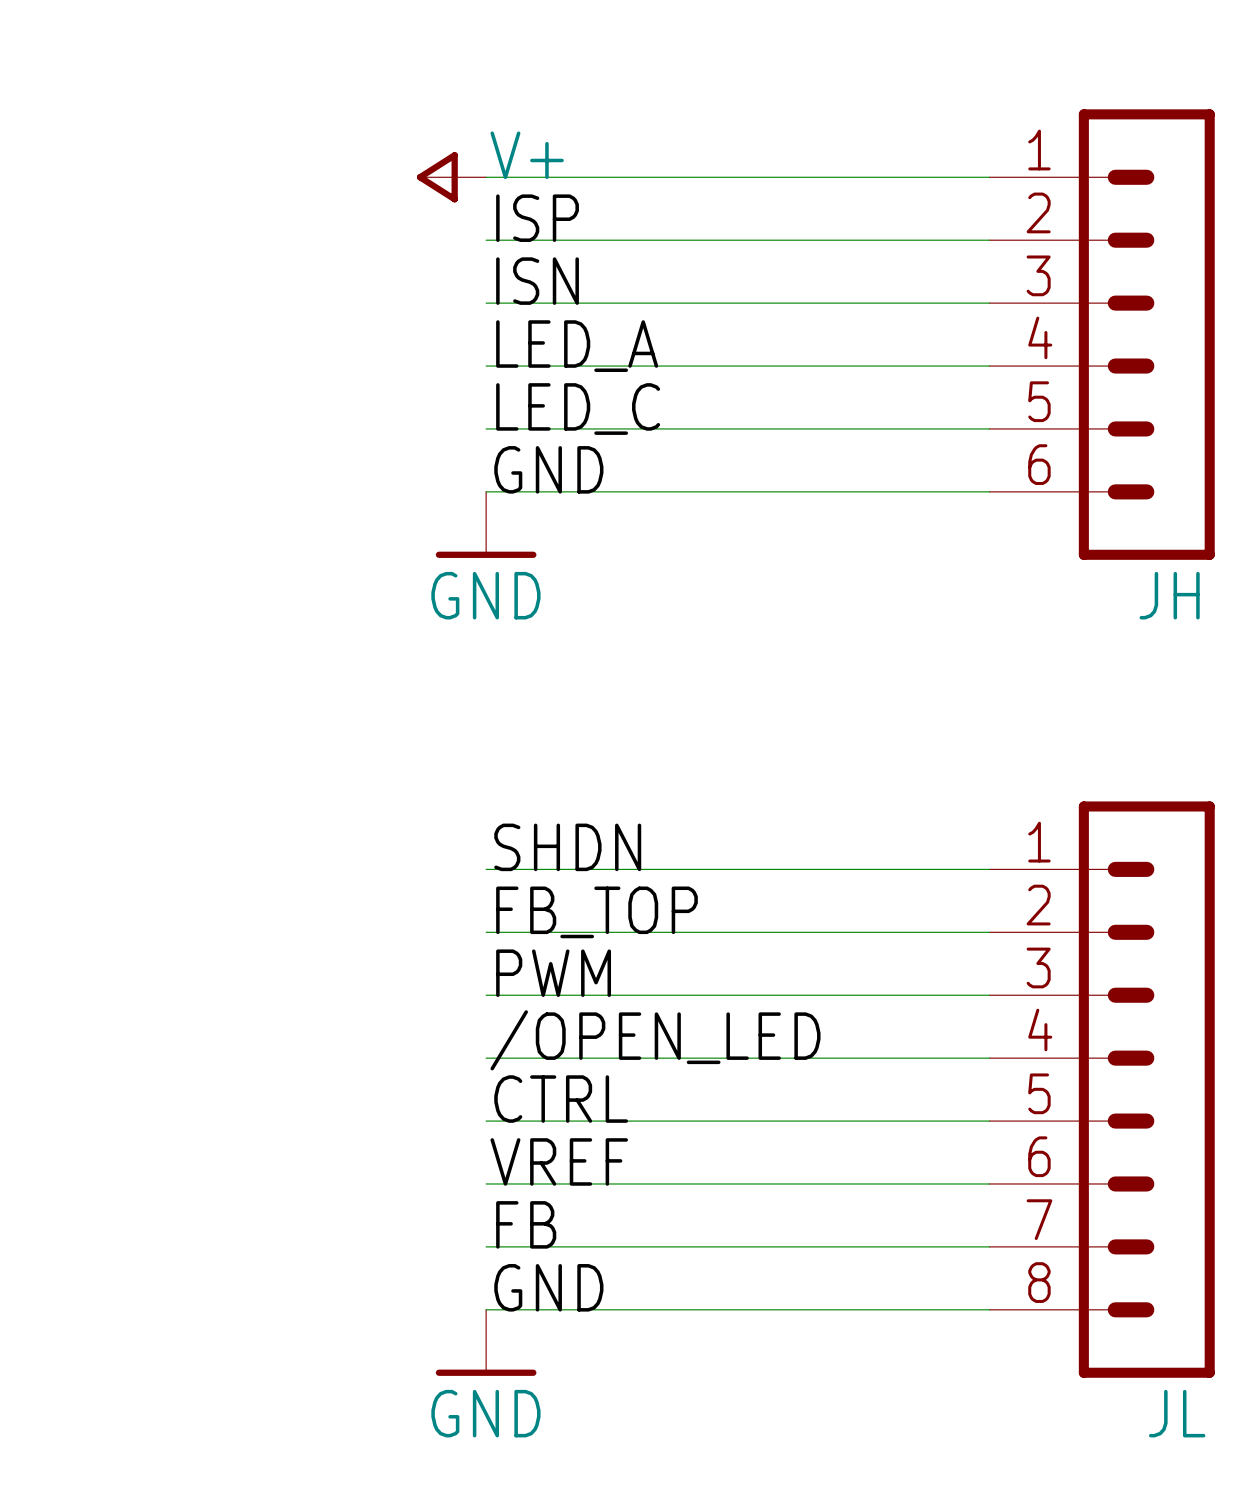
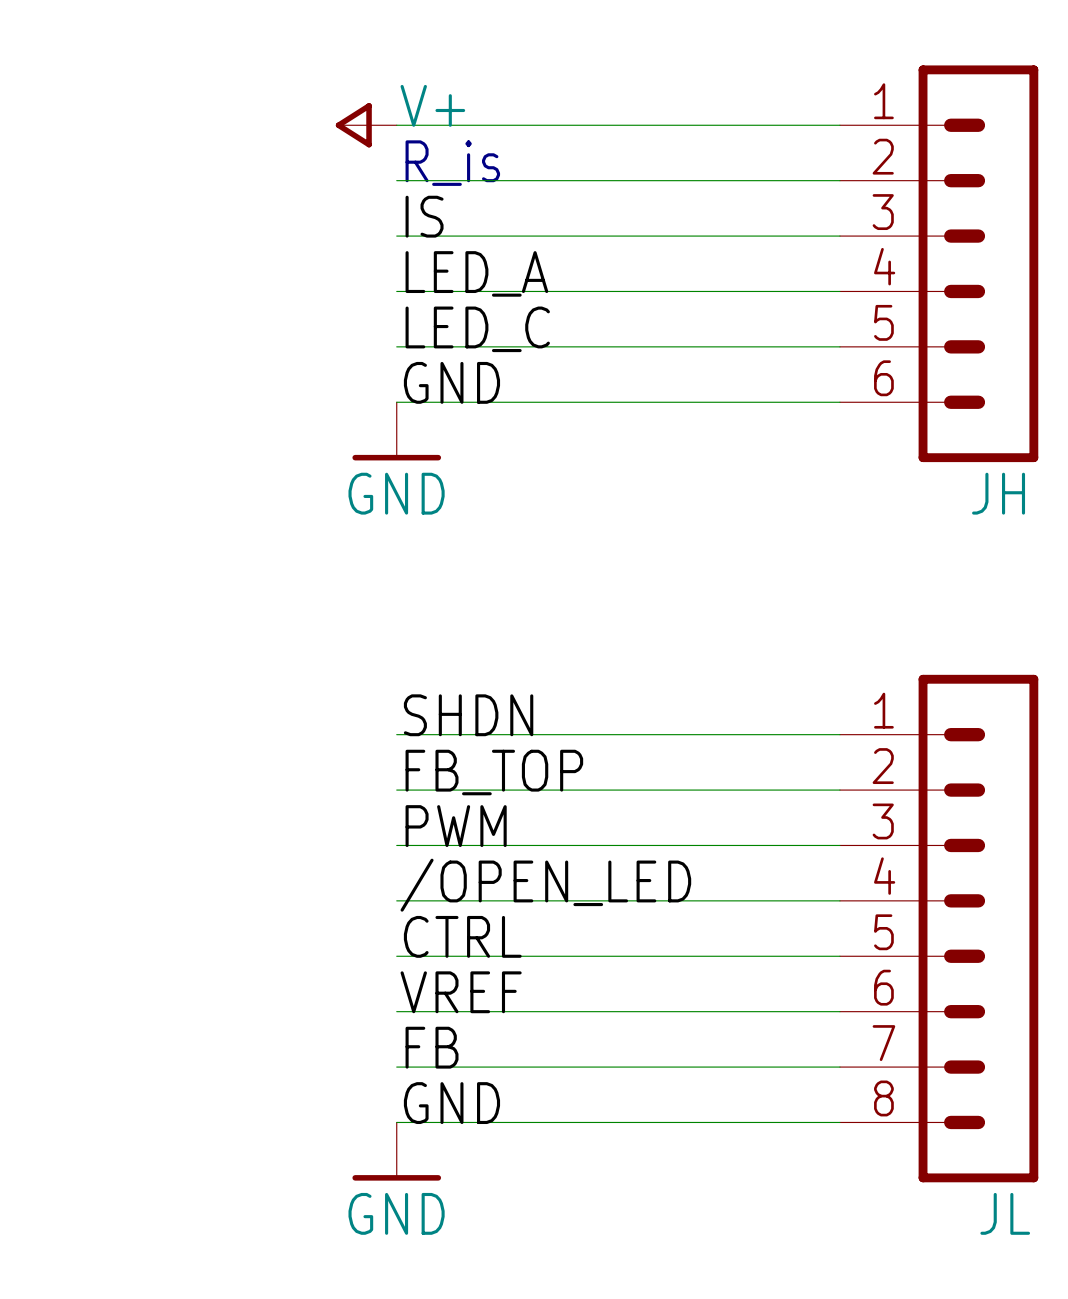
label: ISP (537, 218) -> none
text: none -> R_is (452, 163)
label: ISN (537, 281) -> IS (424, 216)

